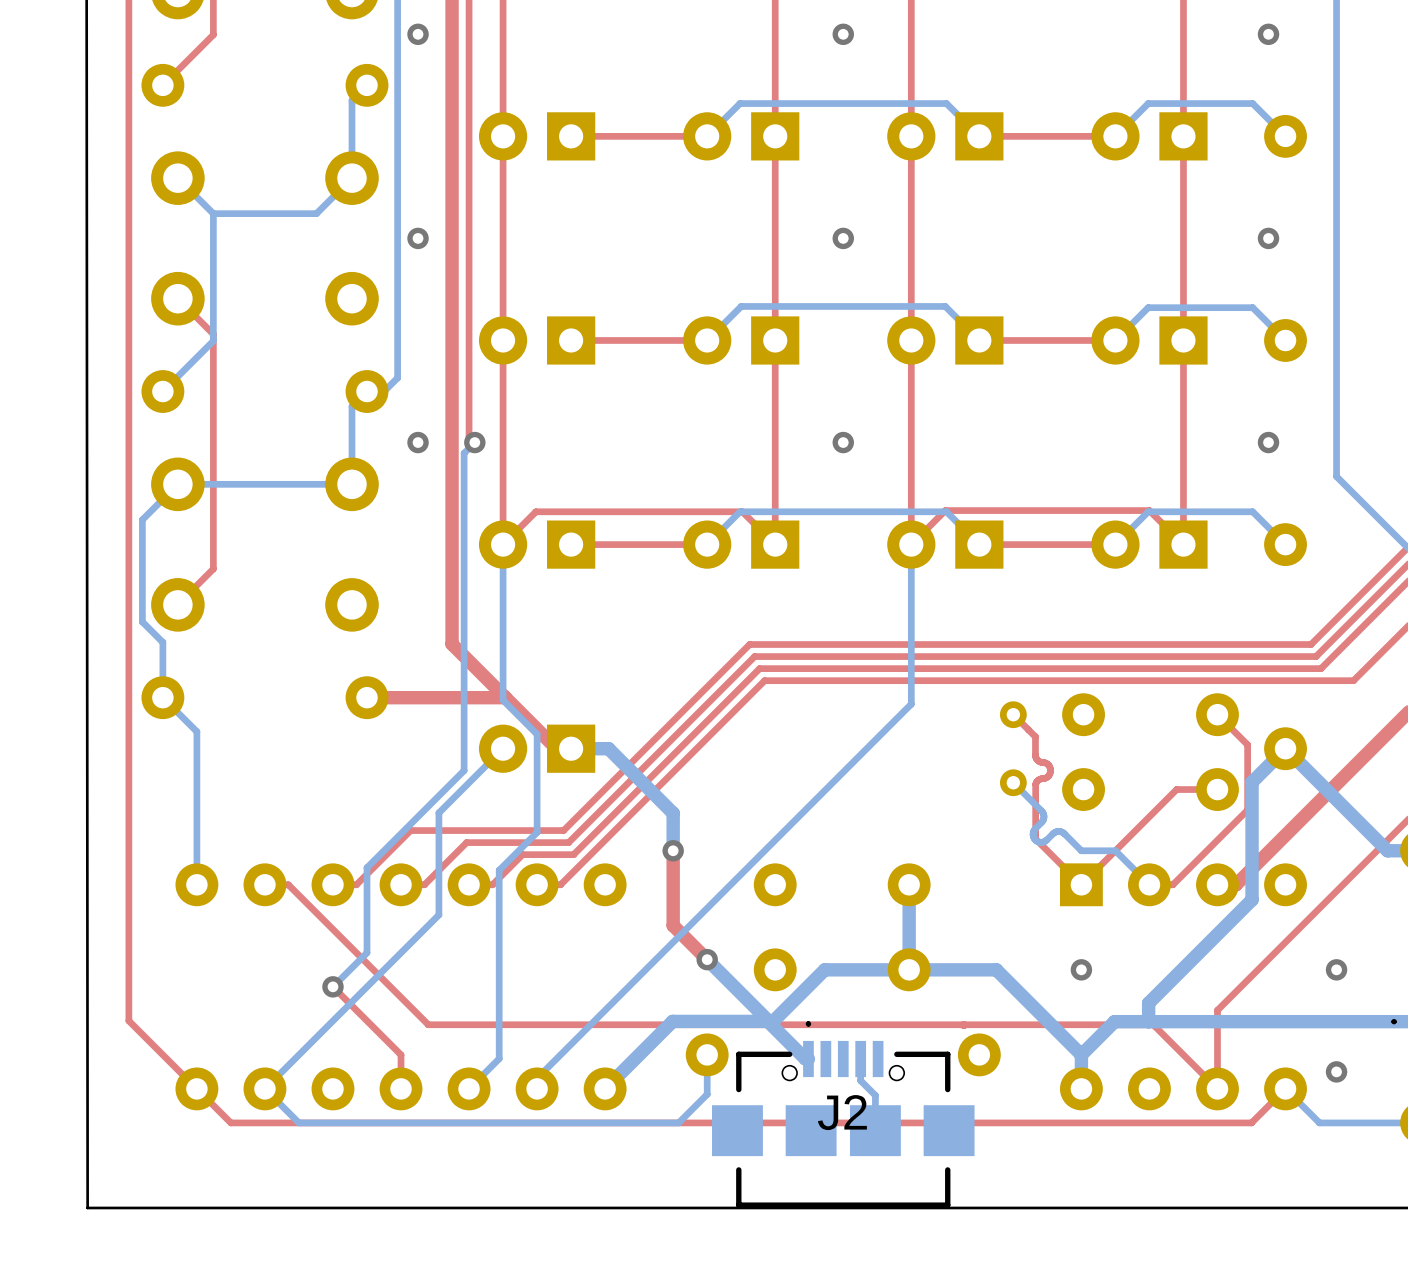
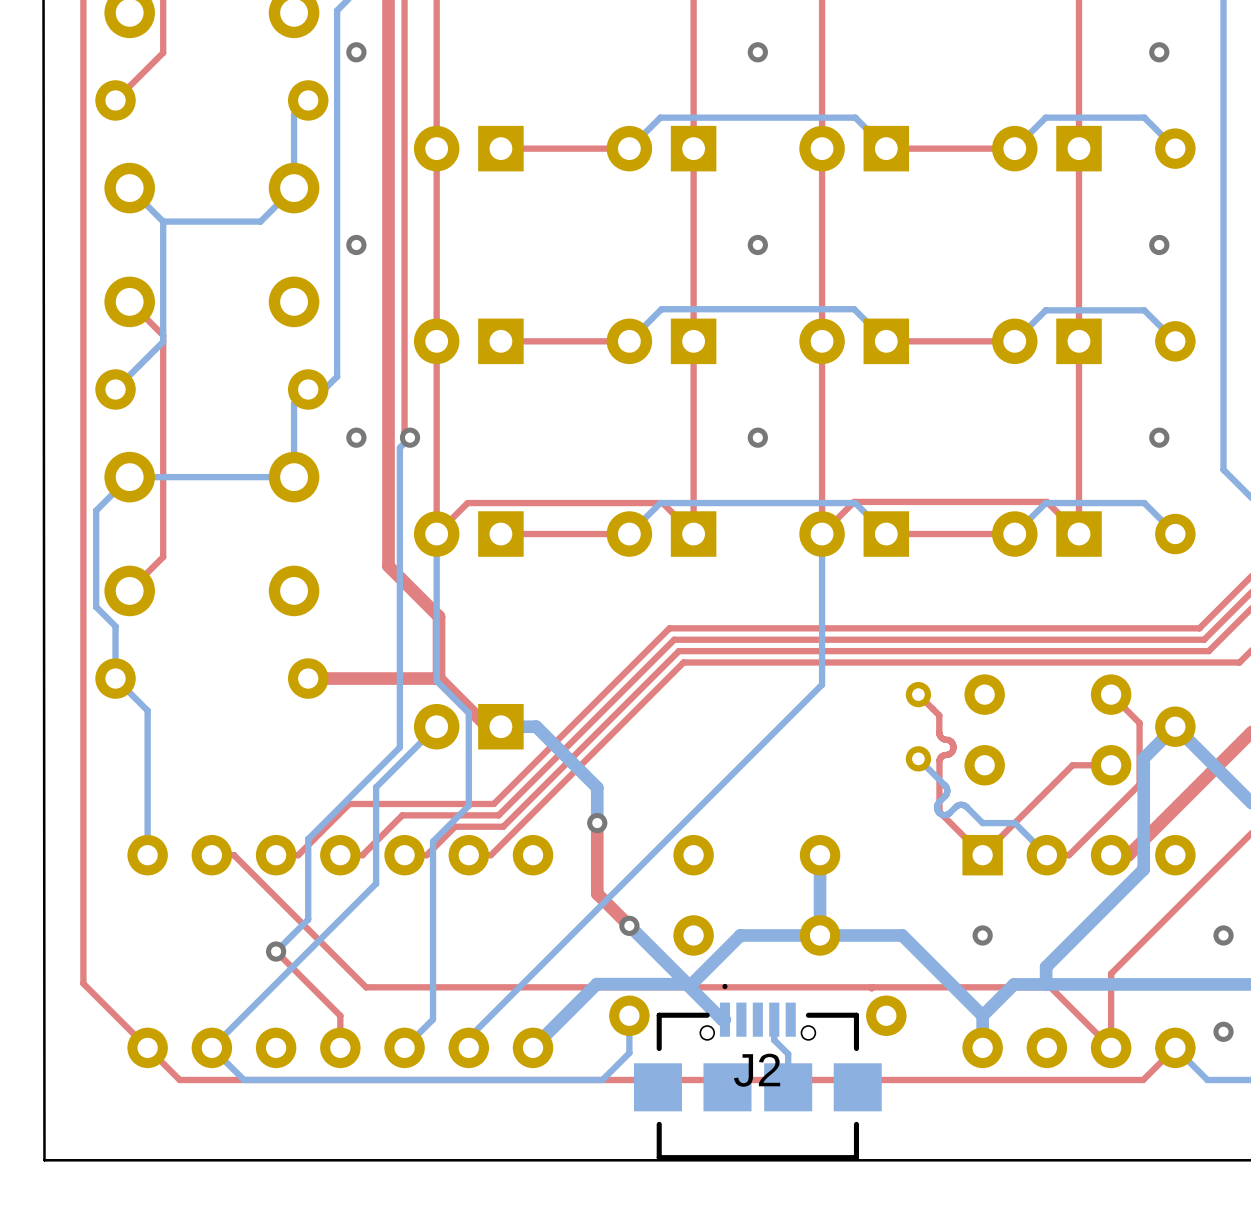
top track: (452, 578) (452, 644) (505, 697) -> (388, 566) (439, 616) (439, 678)

